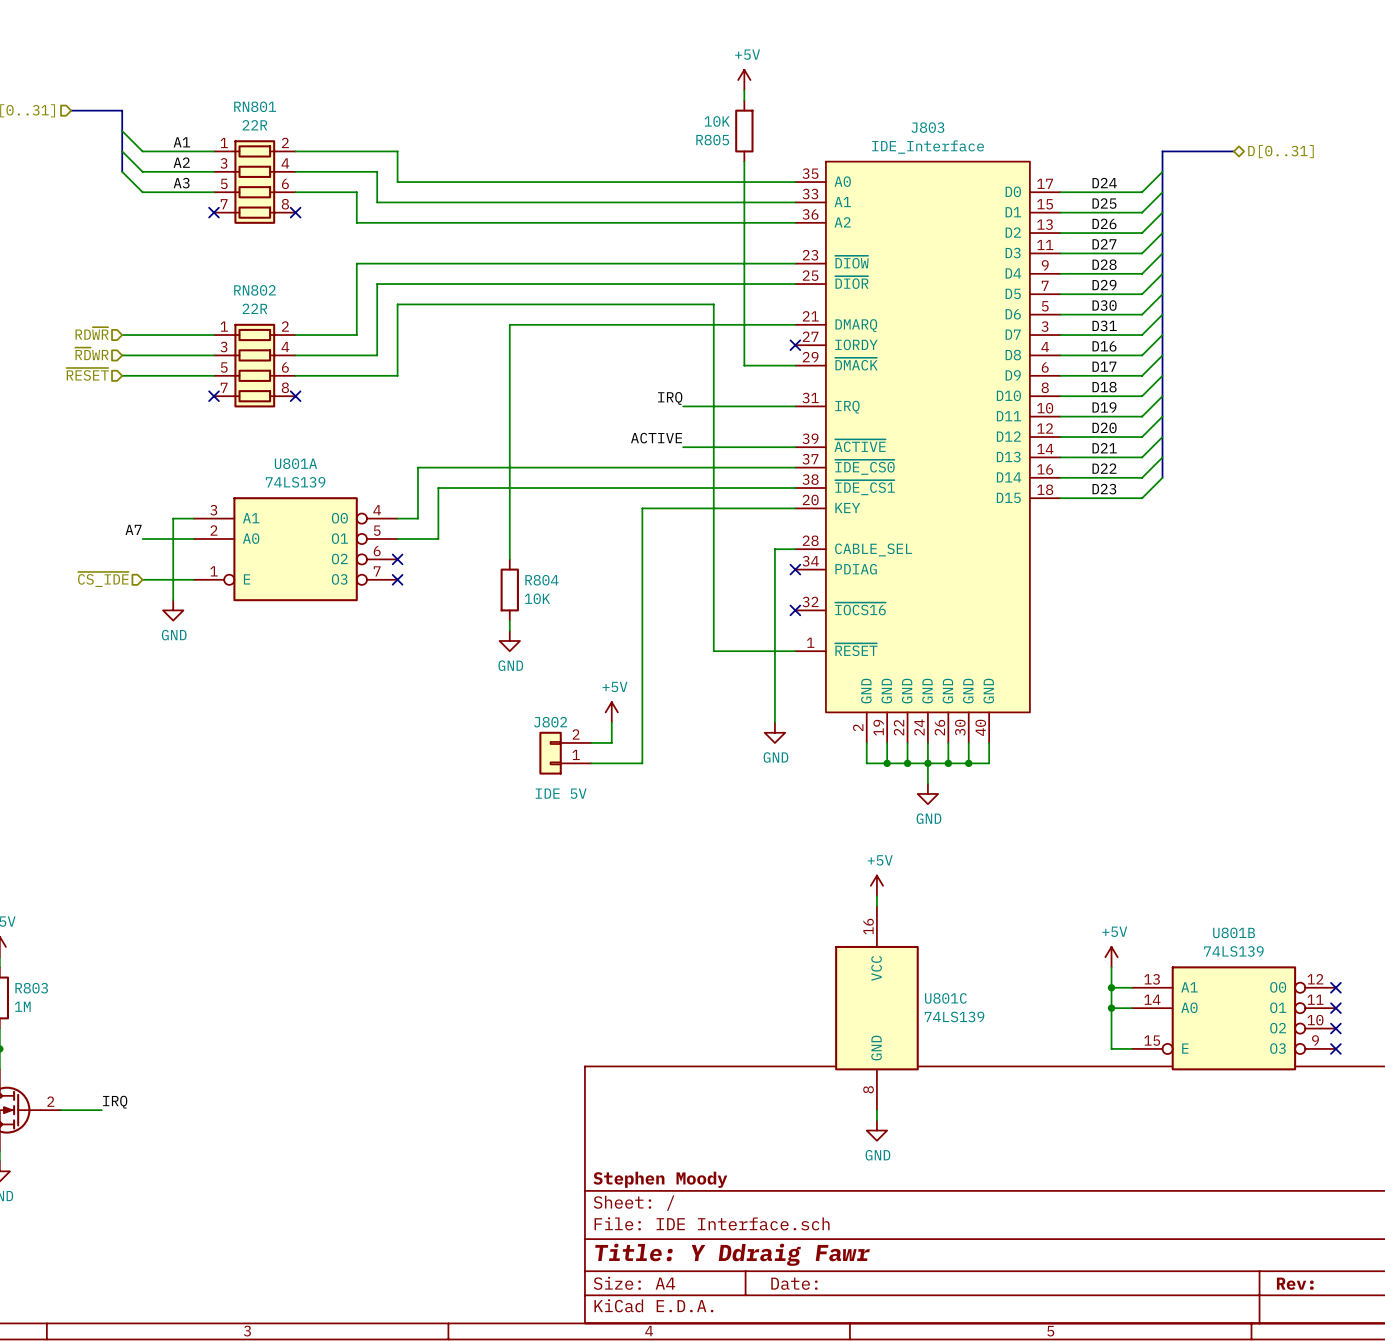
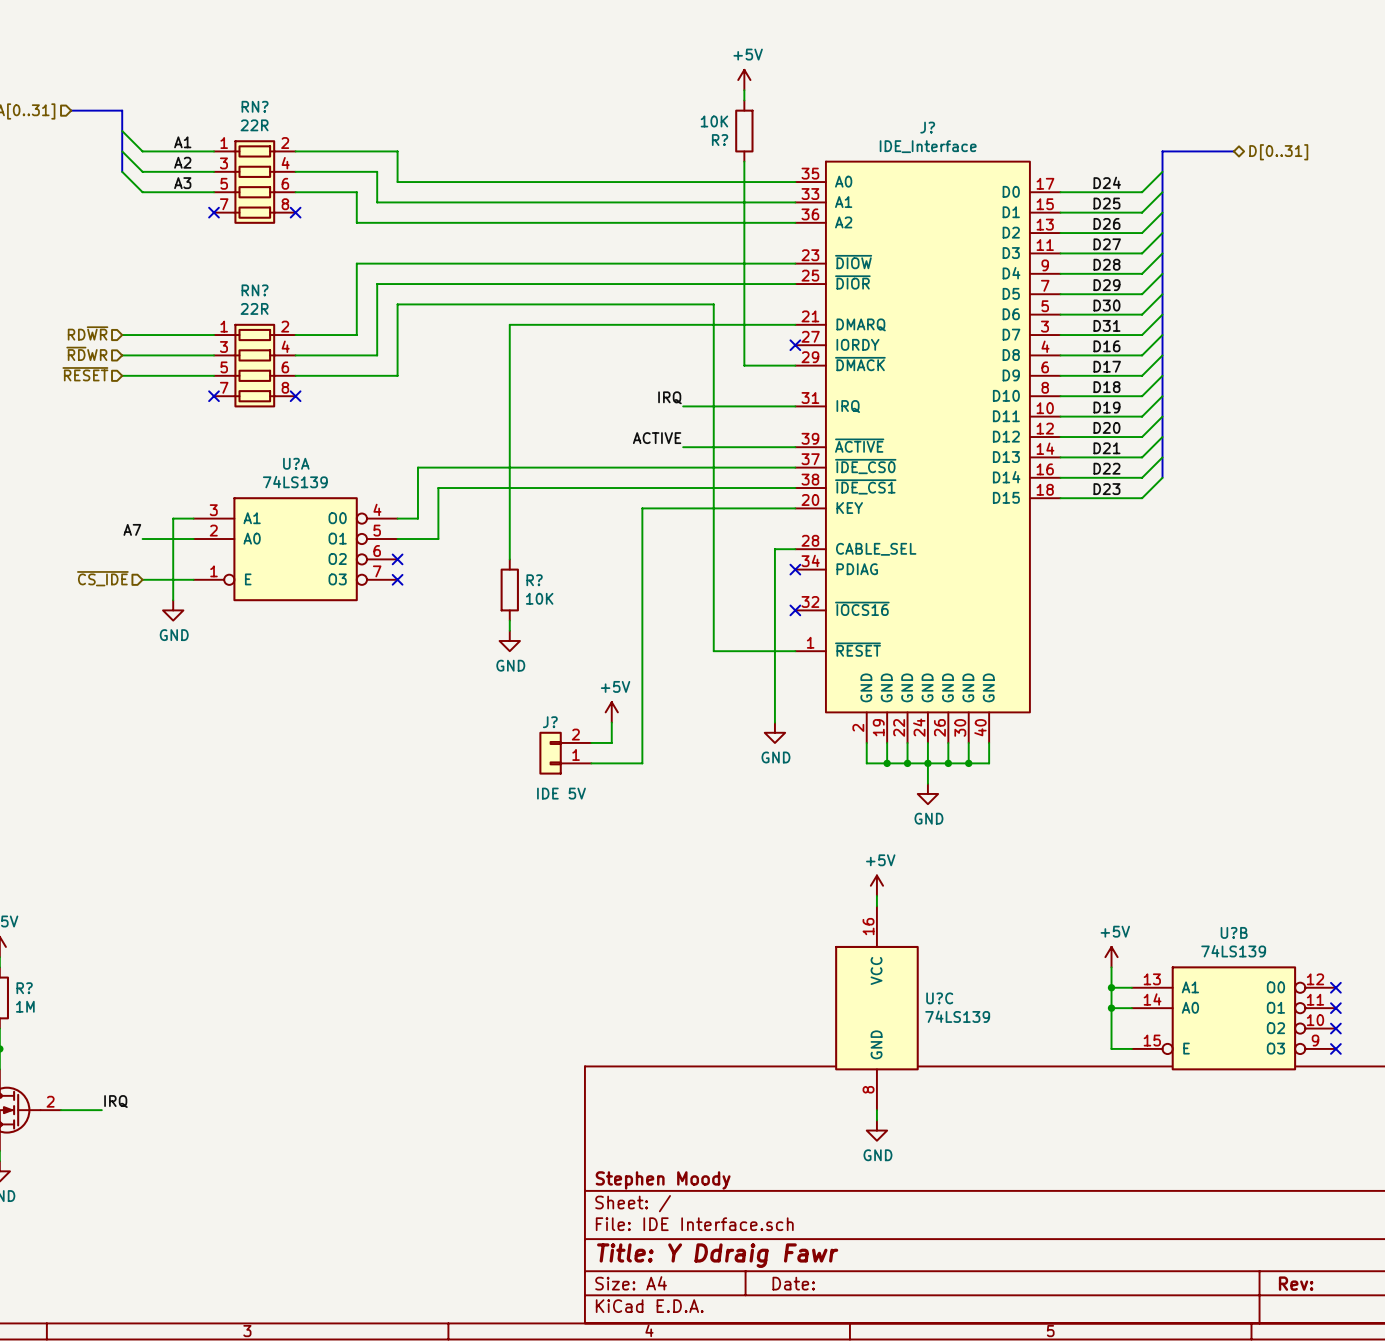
RN801 name: RN801 (255, 106) -> RN? (255, 106)
J803 name: J803 (927, 127) -> J? (927, 127)
R805 name: R805 (712, 140) -> R? (720, 140)
RN802 name: RN802 (254, 290) -> RN? (255, 290)
U801A name: U801A (295, 463) -> U?A (296, 463)
R804 name: R804 (541, 580) -> R? (534, 580)
J802 name: J802 (550, 722) -> J? (550, 722)
U801B name: U801B (1234, 932) -> U?B (1234, 932)
R803 name: R803 (31, 988) -> R? (24, 988)
U801C name: U801C (945, 998) -> U?C (939, 998)

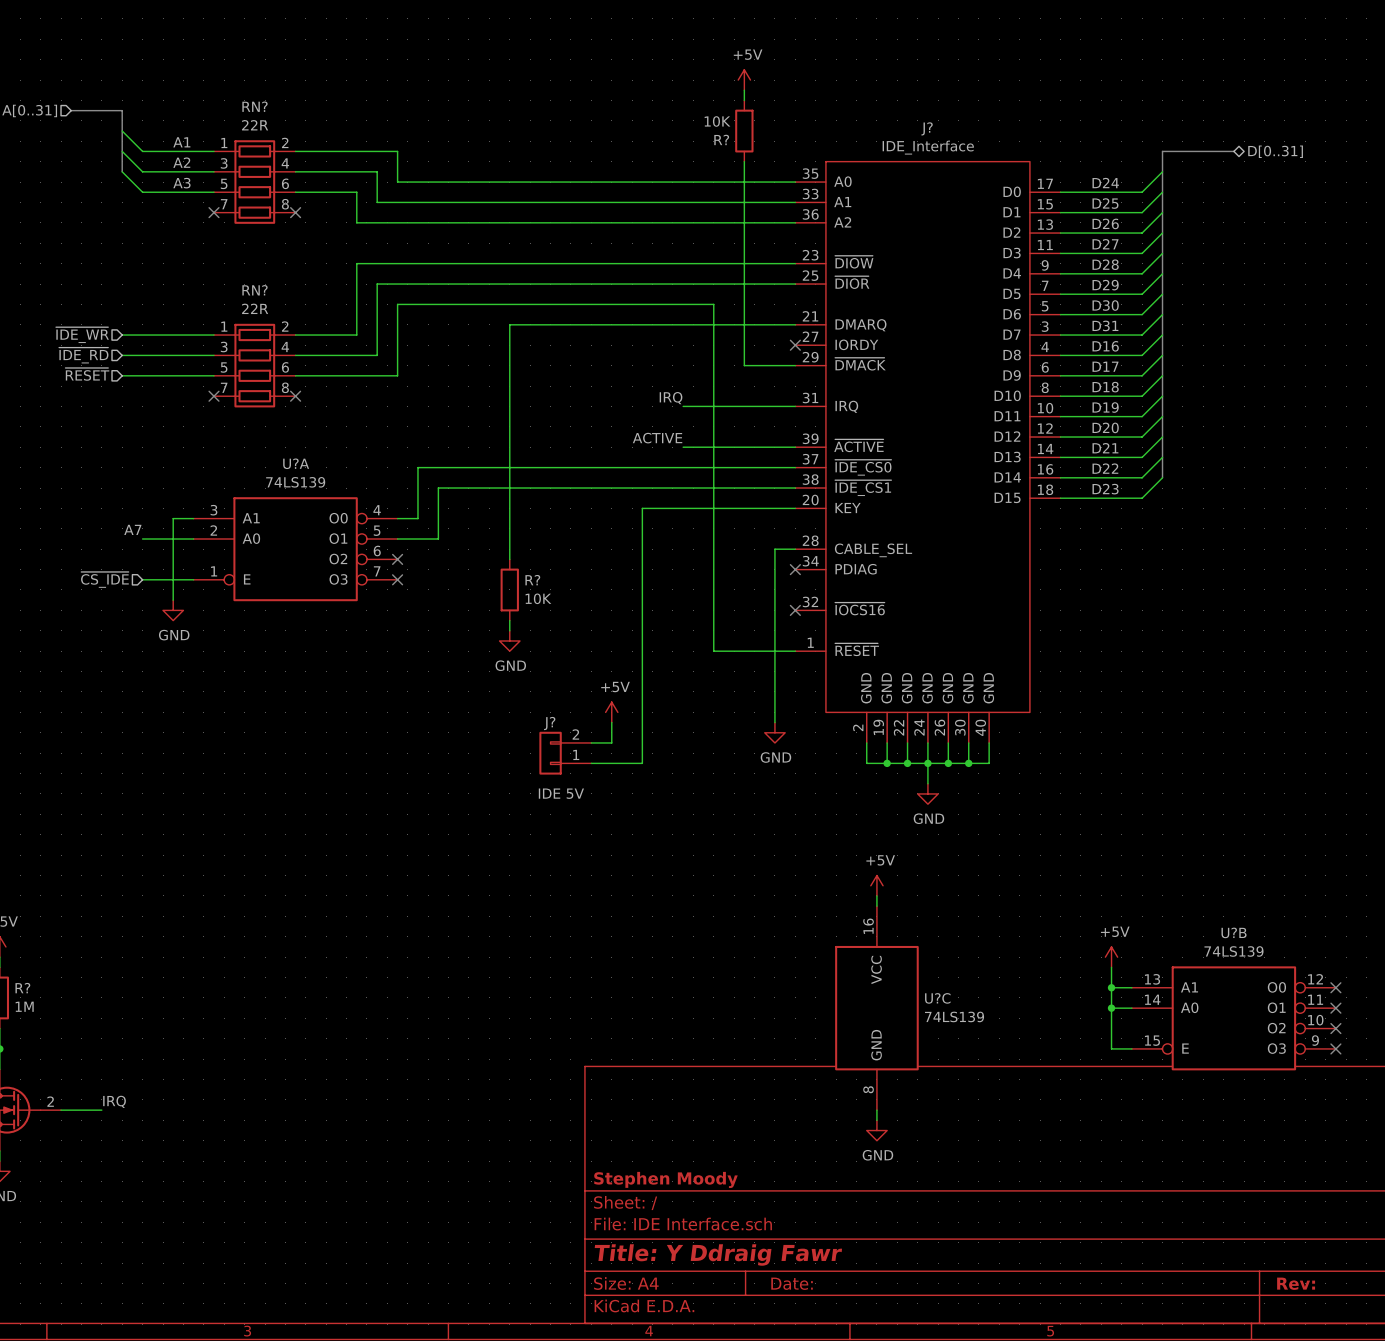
hierarchical label: RD~{WR} (88, 333) -> ~{IDE_WR} (82, 335)
hierarchical label: ~{RD}WR (86, 353) -> ~{IDE_RD} (83, 355)

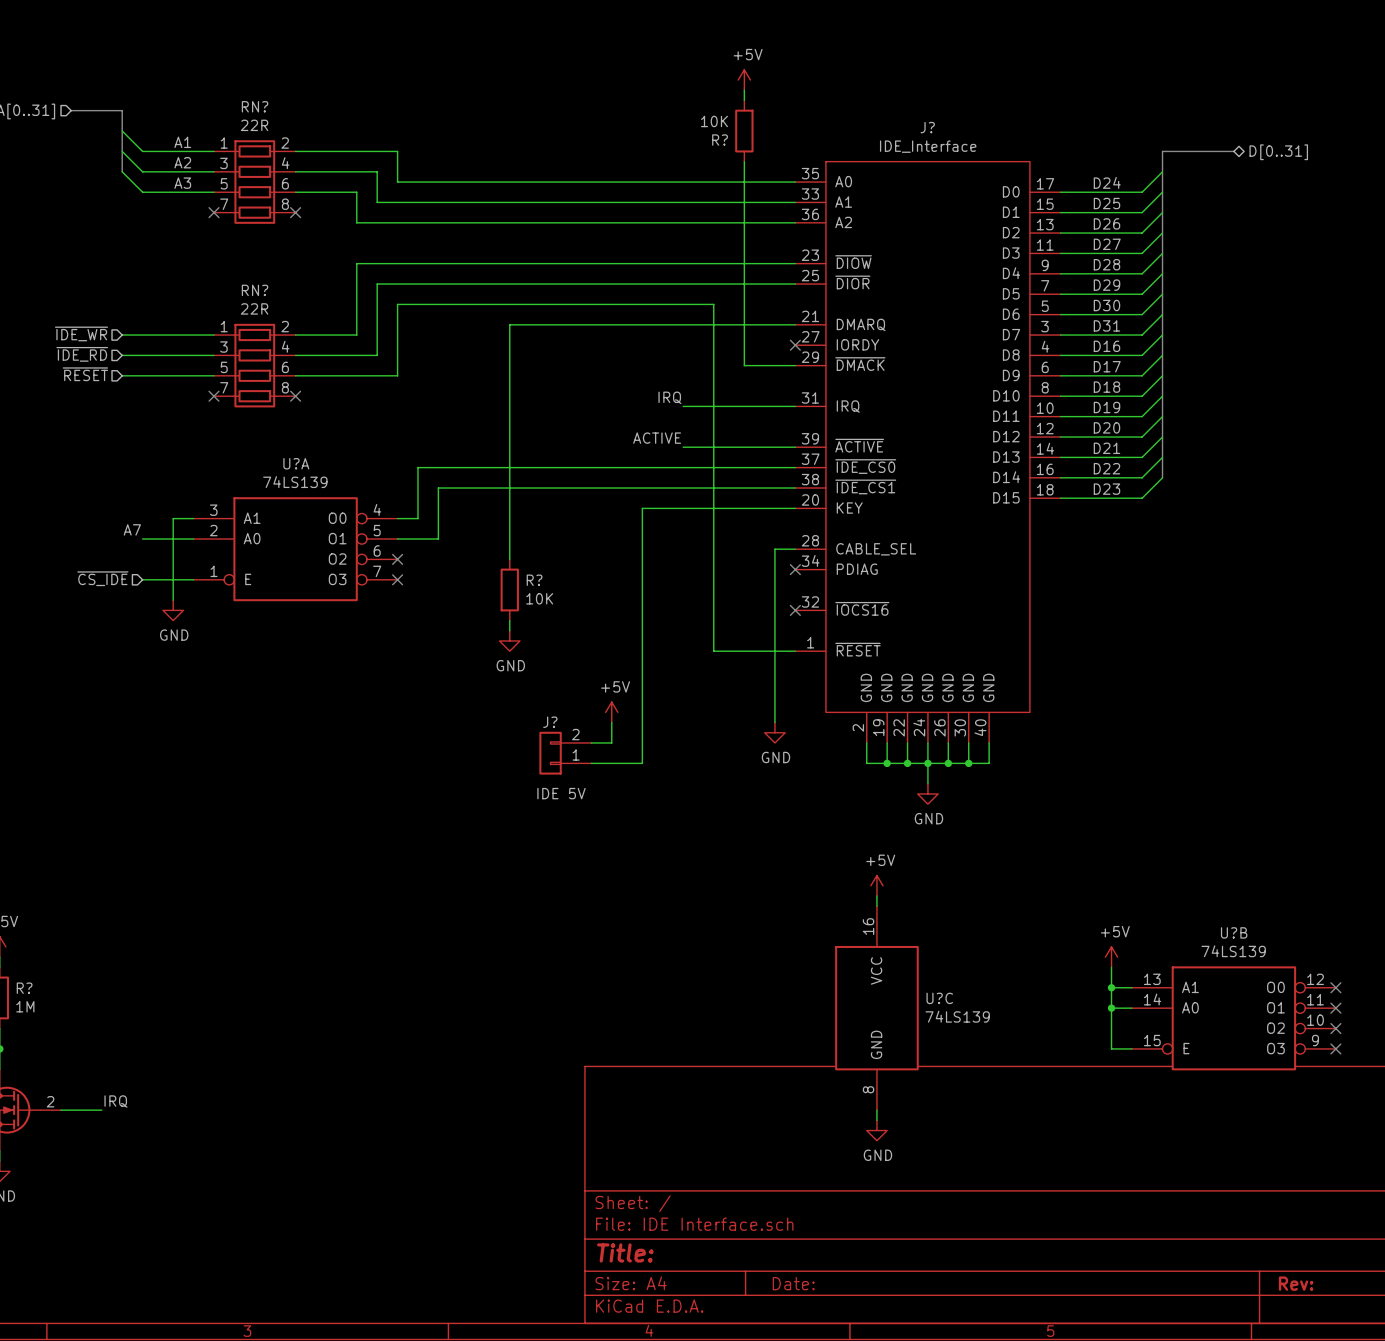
title block: Stephen Moody (665, 1179) -> none
title block: Title: Y Ddraig Fawr (718, 1254) -> Title: (625, 1252)

